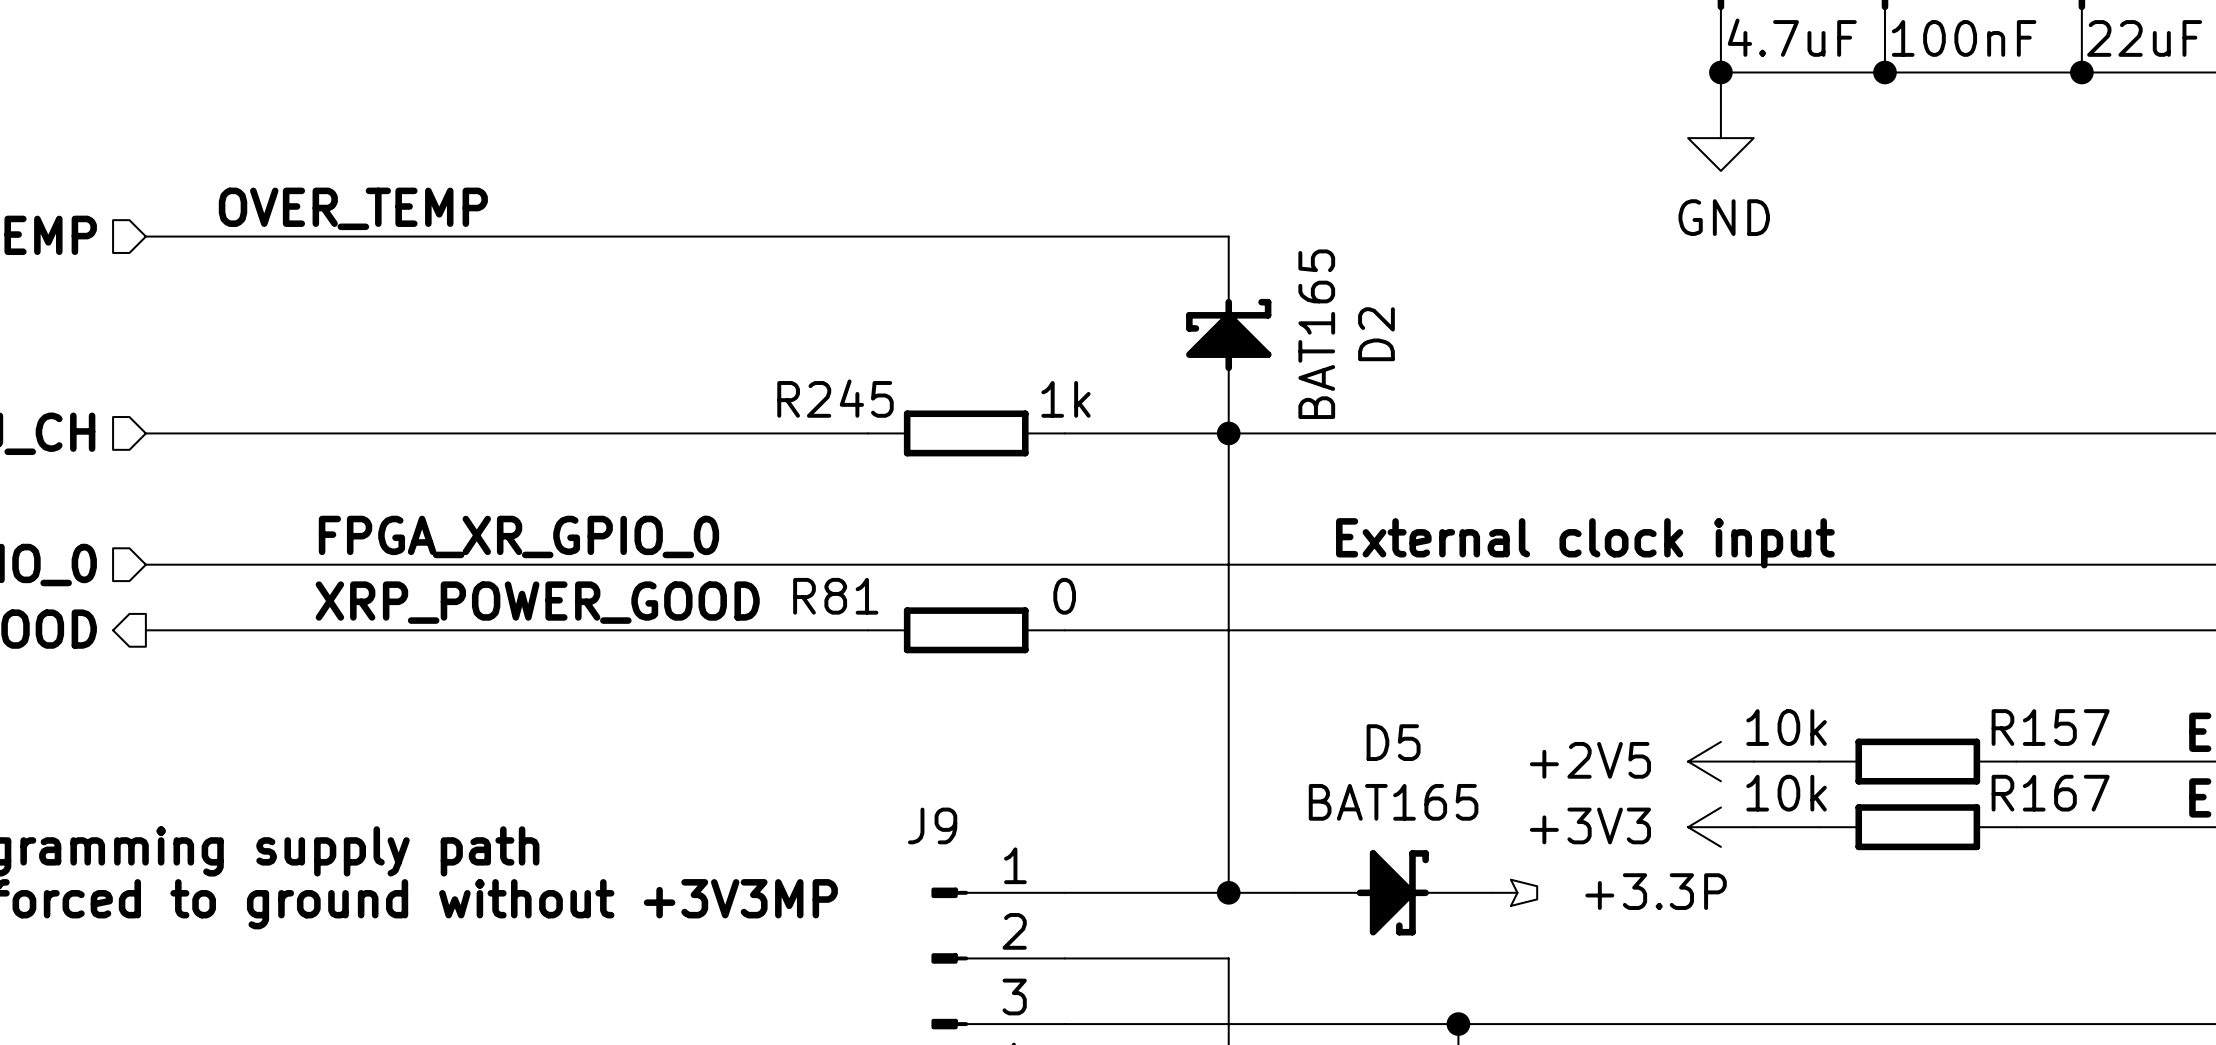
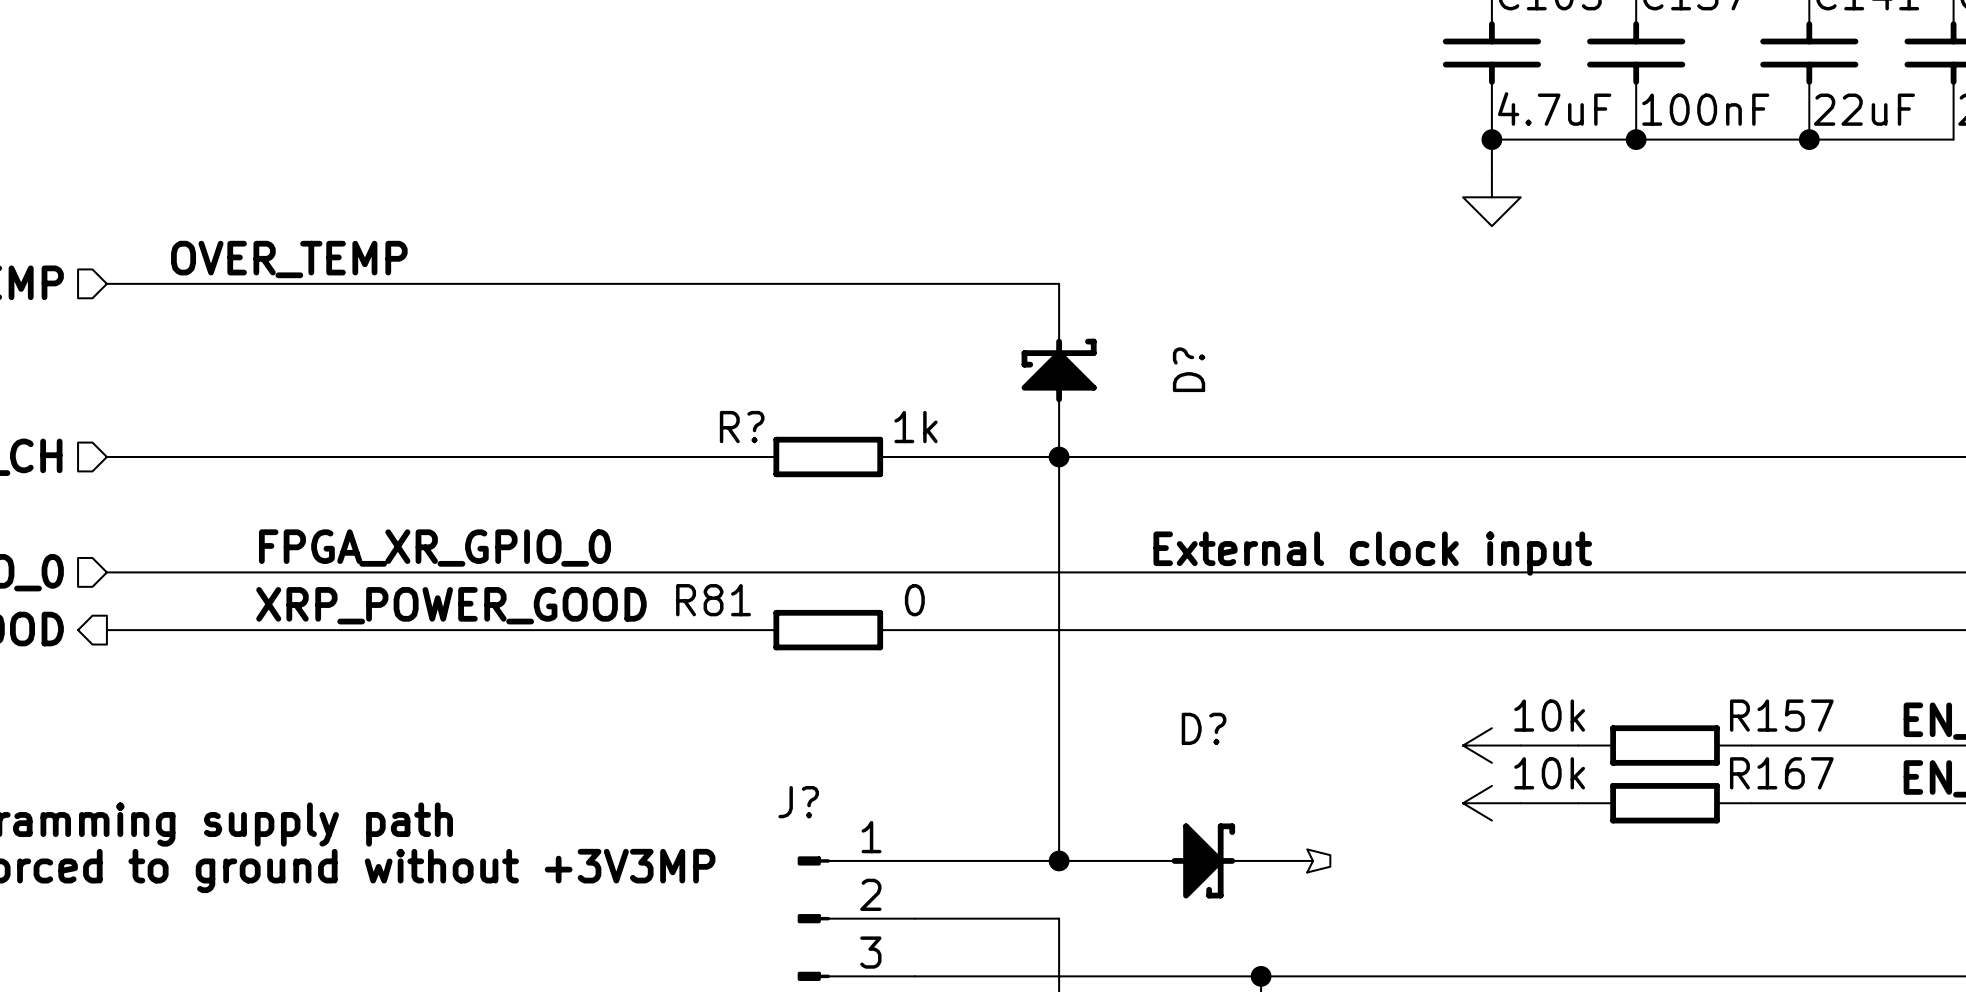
power symbol text: GND (1724, 217) -> none
D2 value: BAT165 (1316, 334) -> none
D2 name: D2 (1376, 334) -> D? (1189, 369)
R245 name: R245 (835, 398) -> R? (742, 427)
D5 name: D5 (1393, 742) -> D? (1204, 728)
power symbol text: +2V5 (1590, 760) -> none
D5 value: BAT165 (1393, 802) -> none
J9 name: J9 (932, 825) -> J? (798, 802)
power symbol text: +3V3 (1590, 825) -> none
power symbol text: +3.3P (1656, 891) -> none

